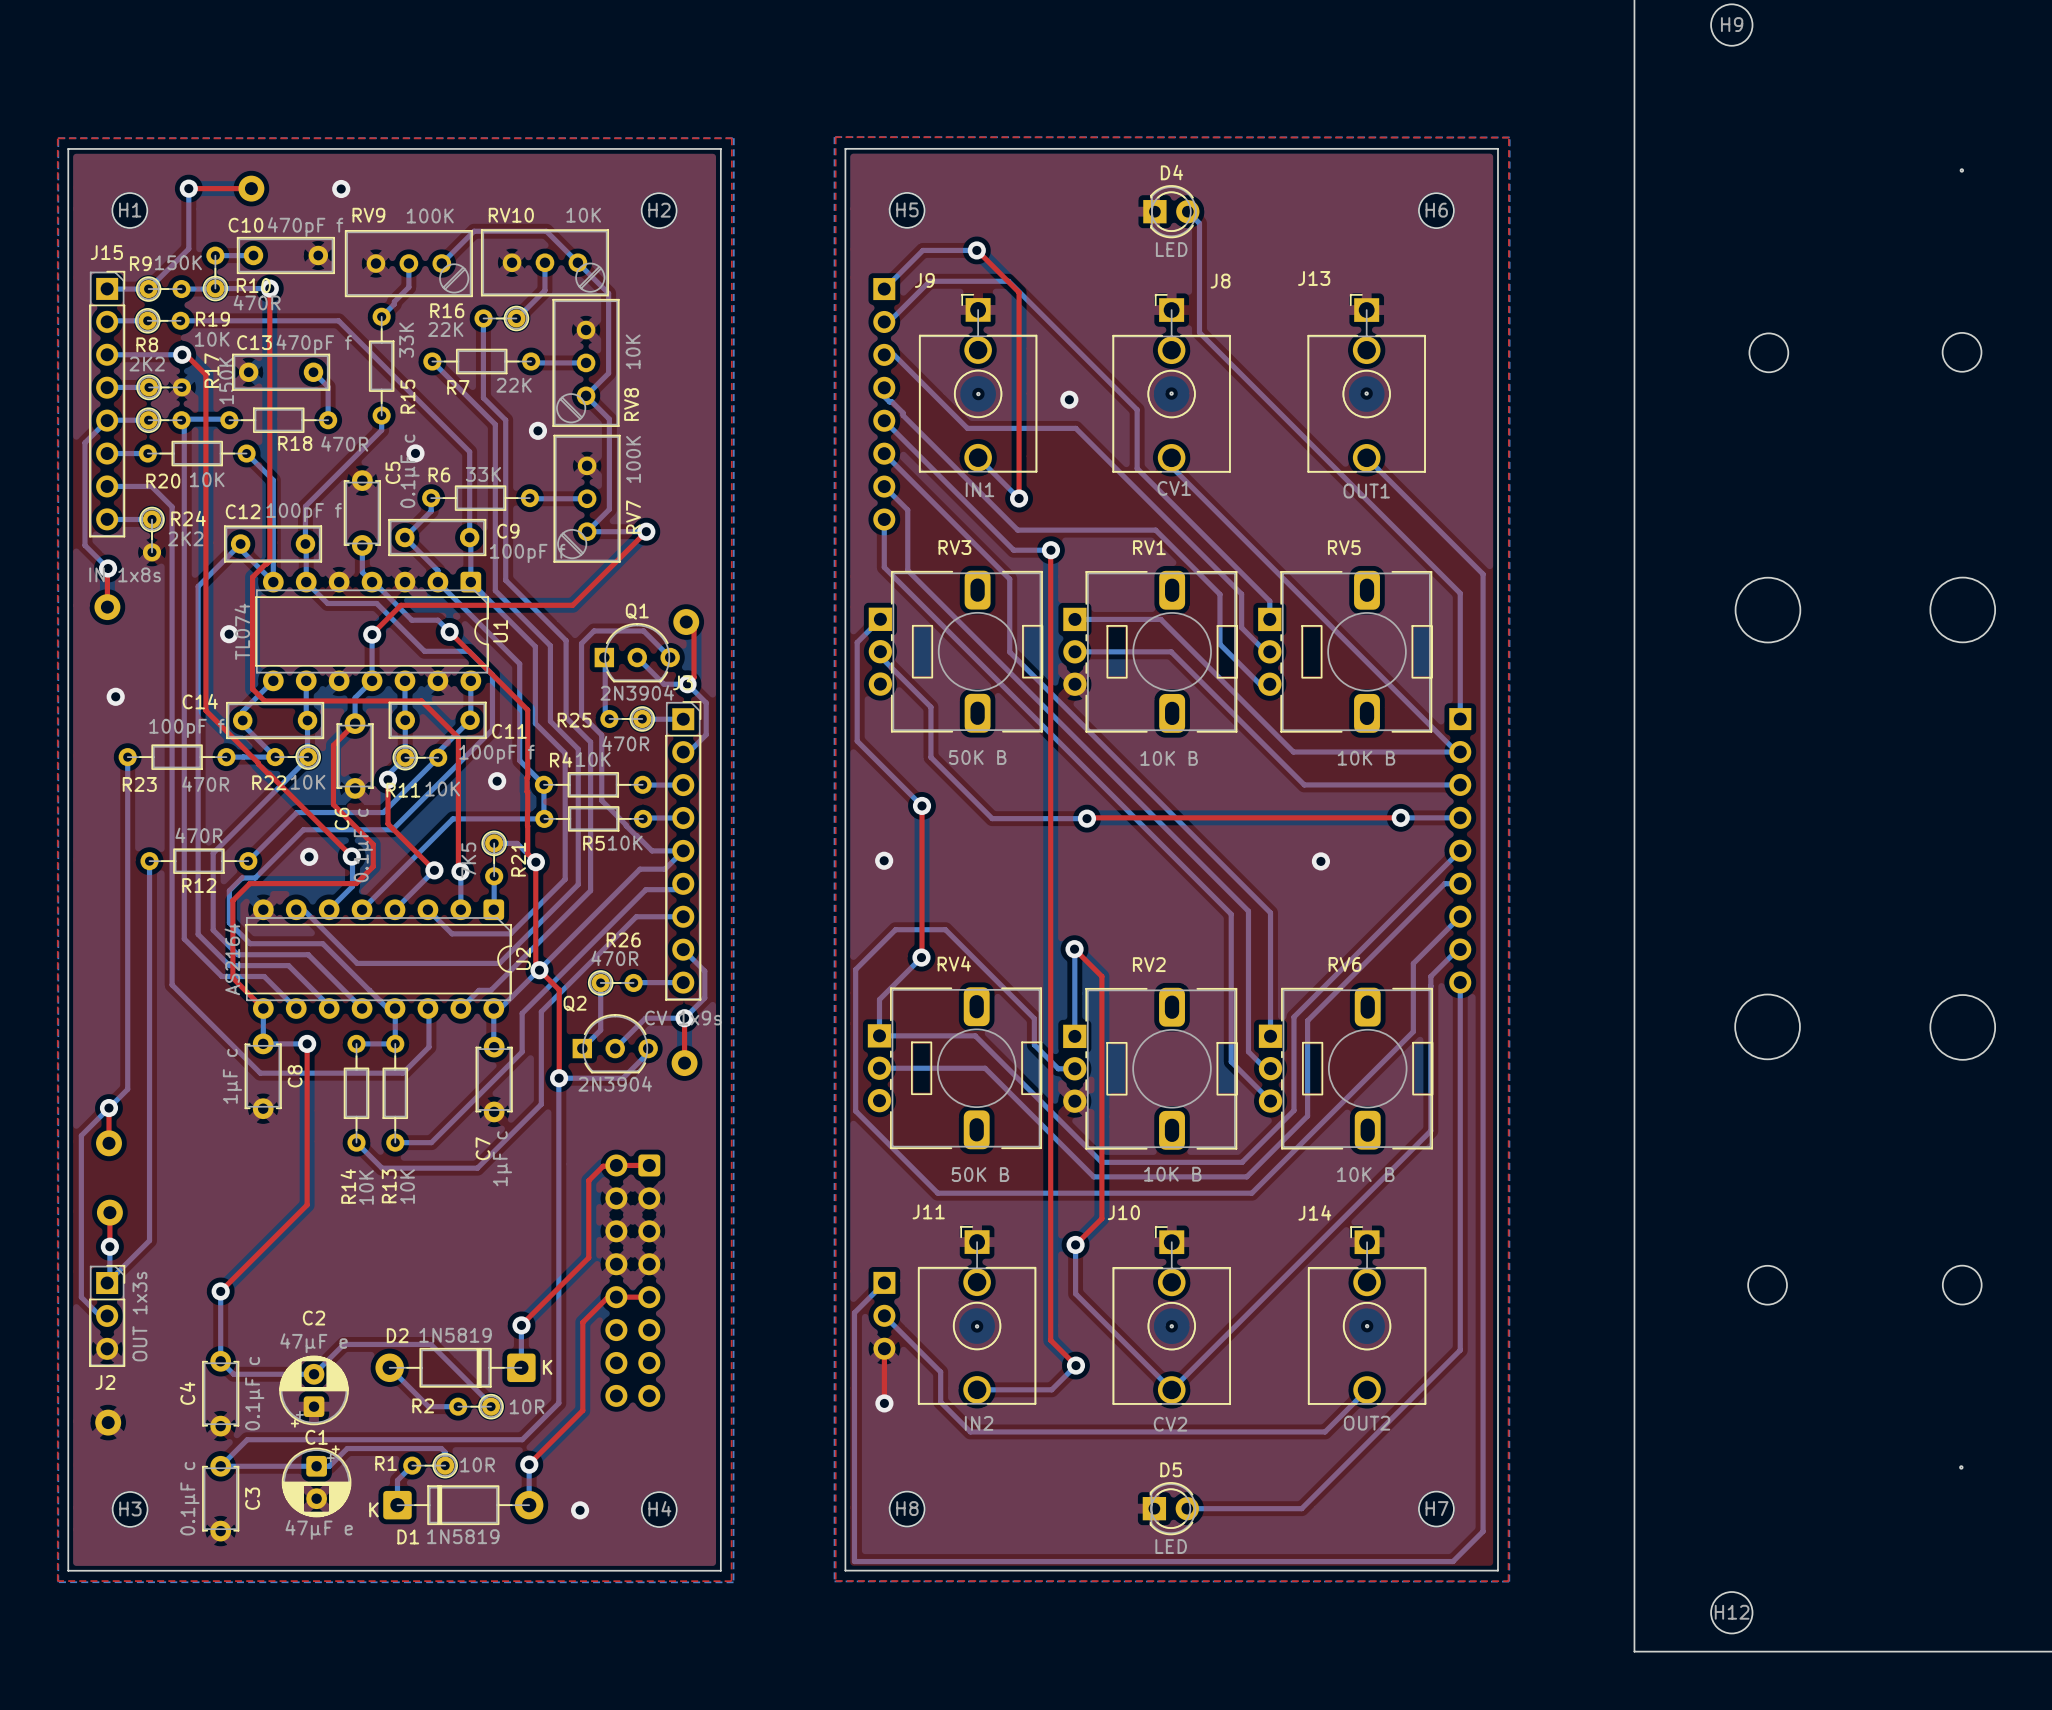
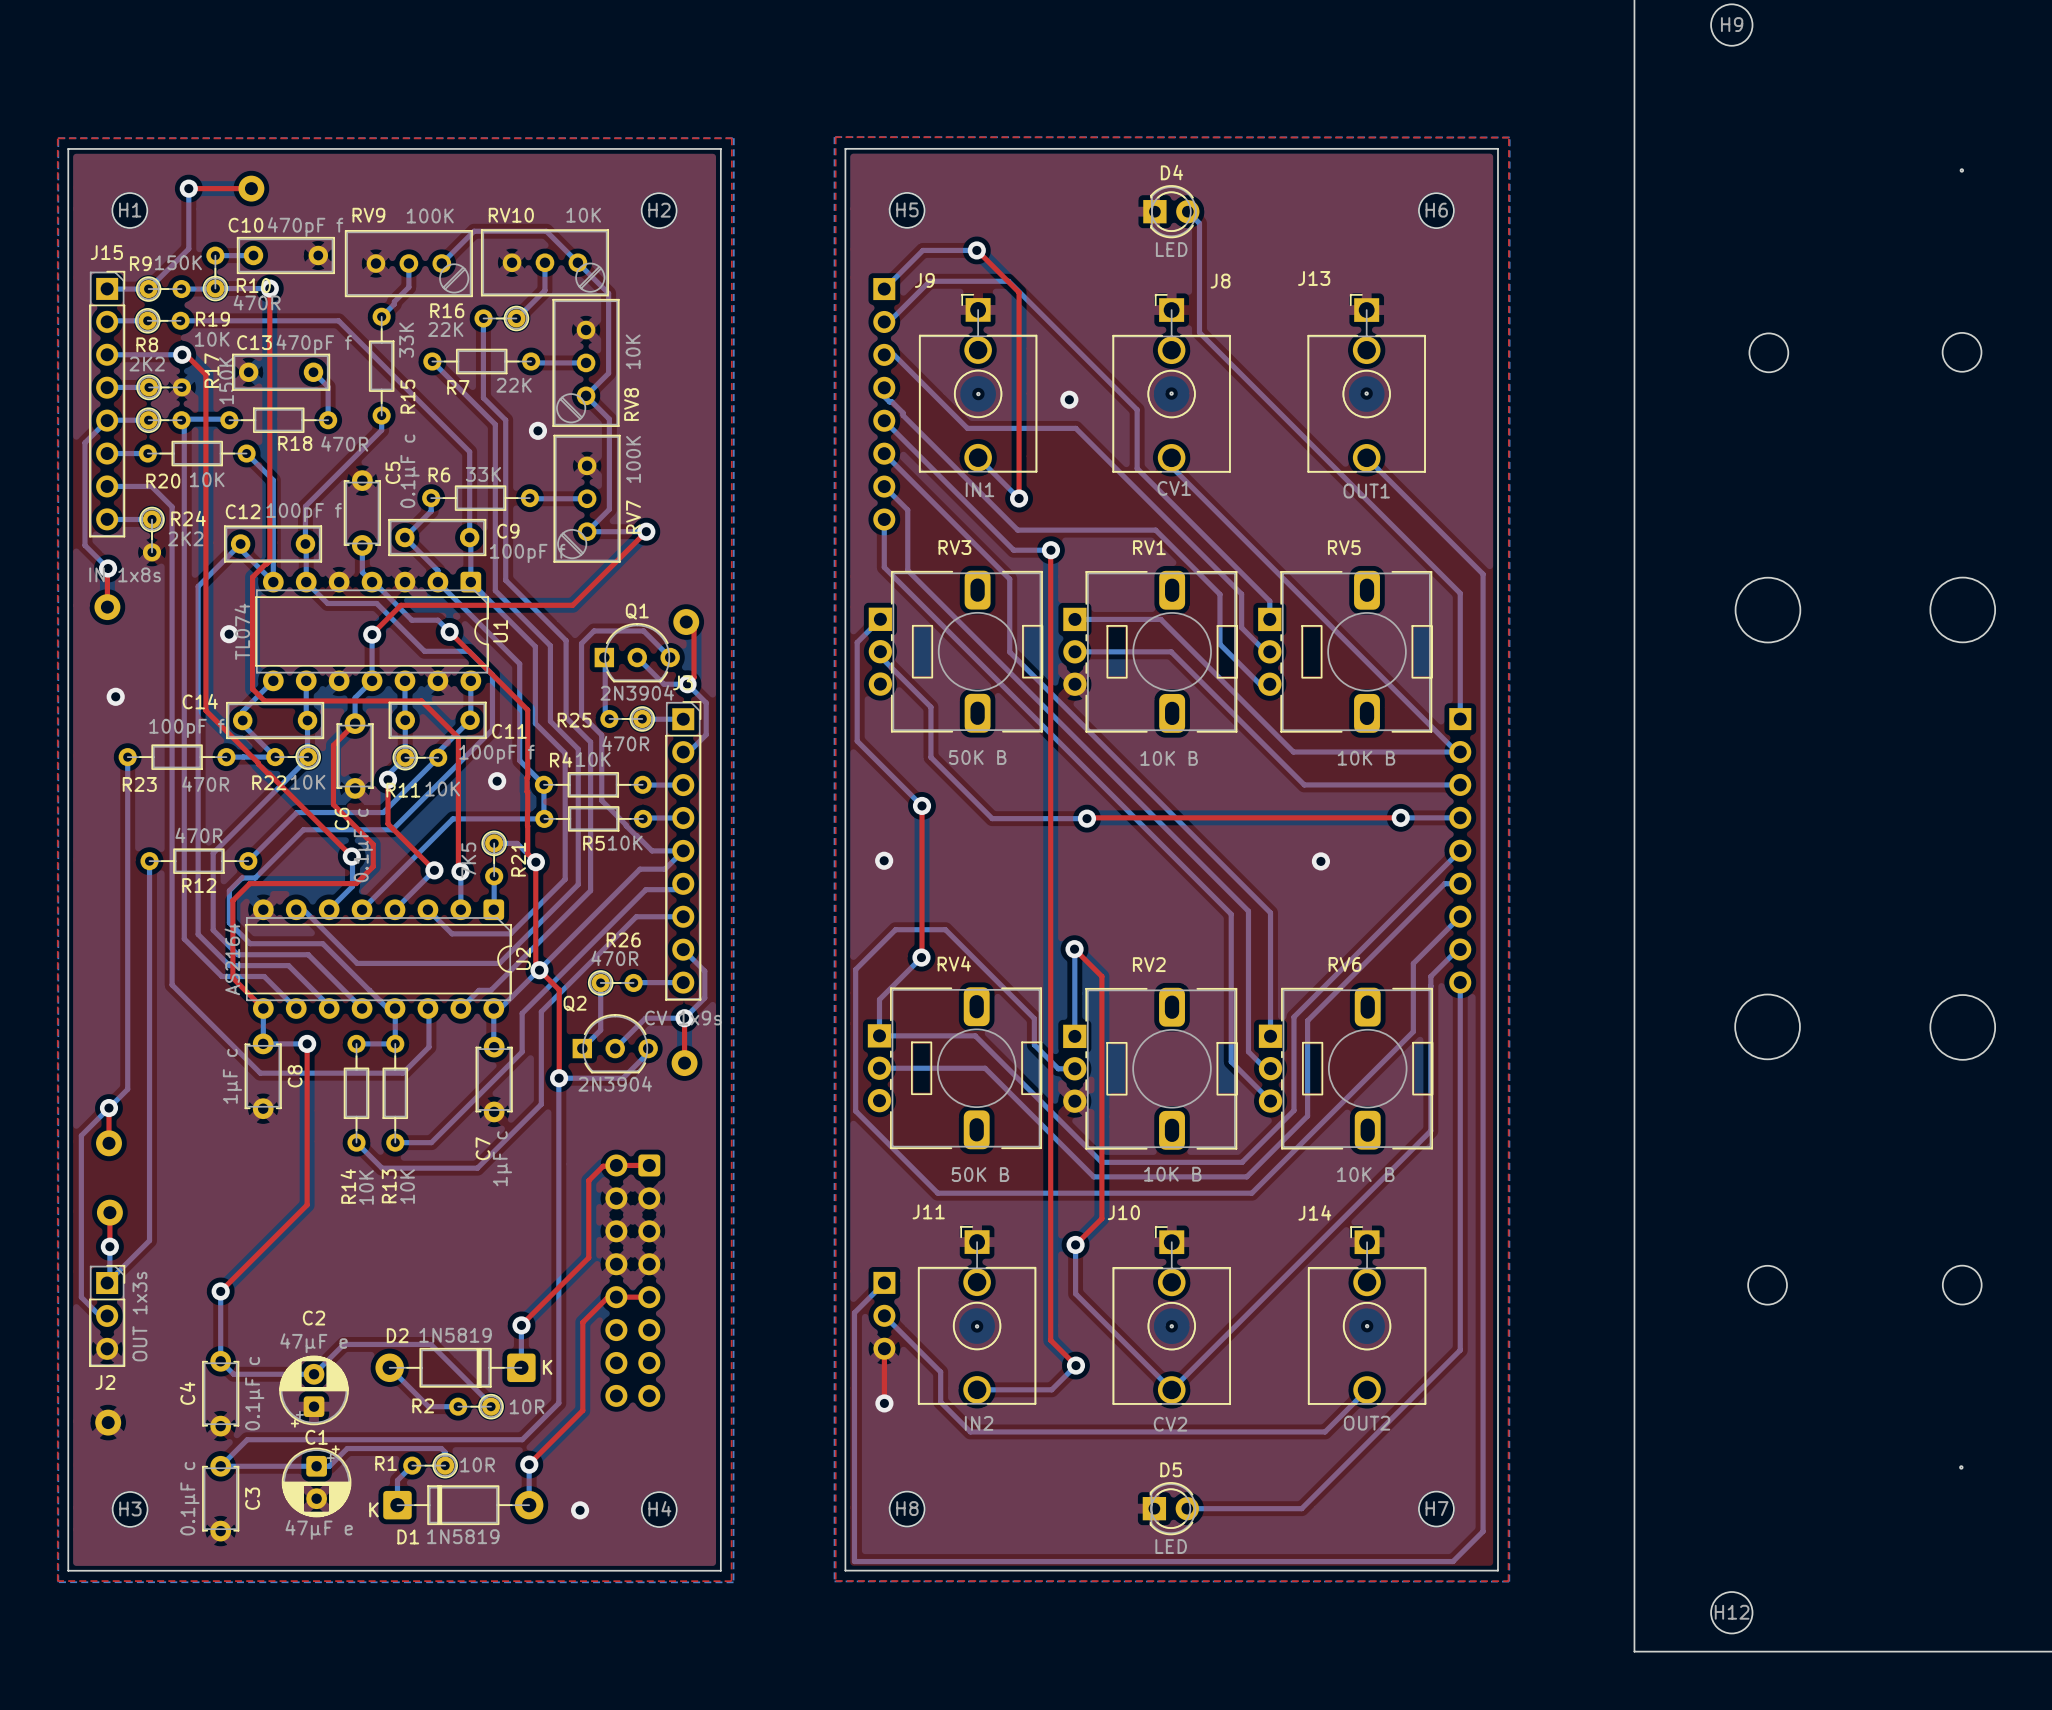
via: (341, 189) -> none
via: (415, 453) -> none
via: (309, 856) -> none

